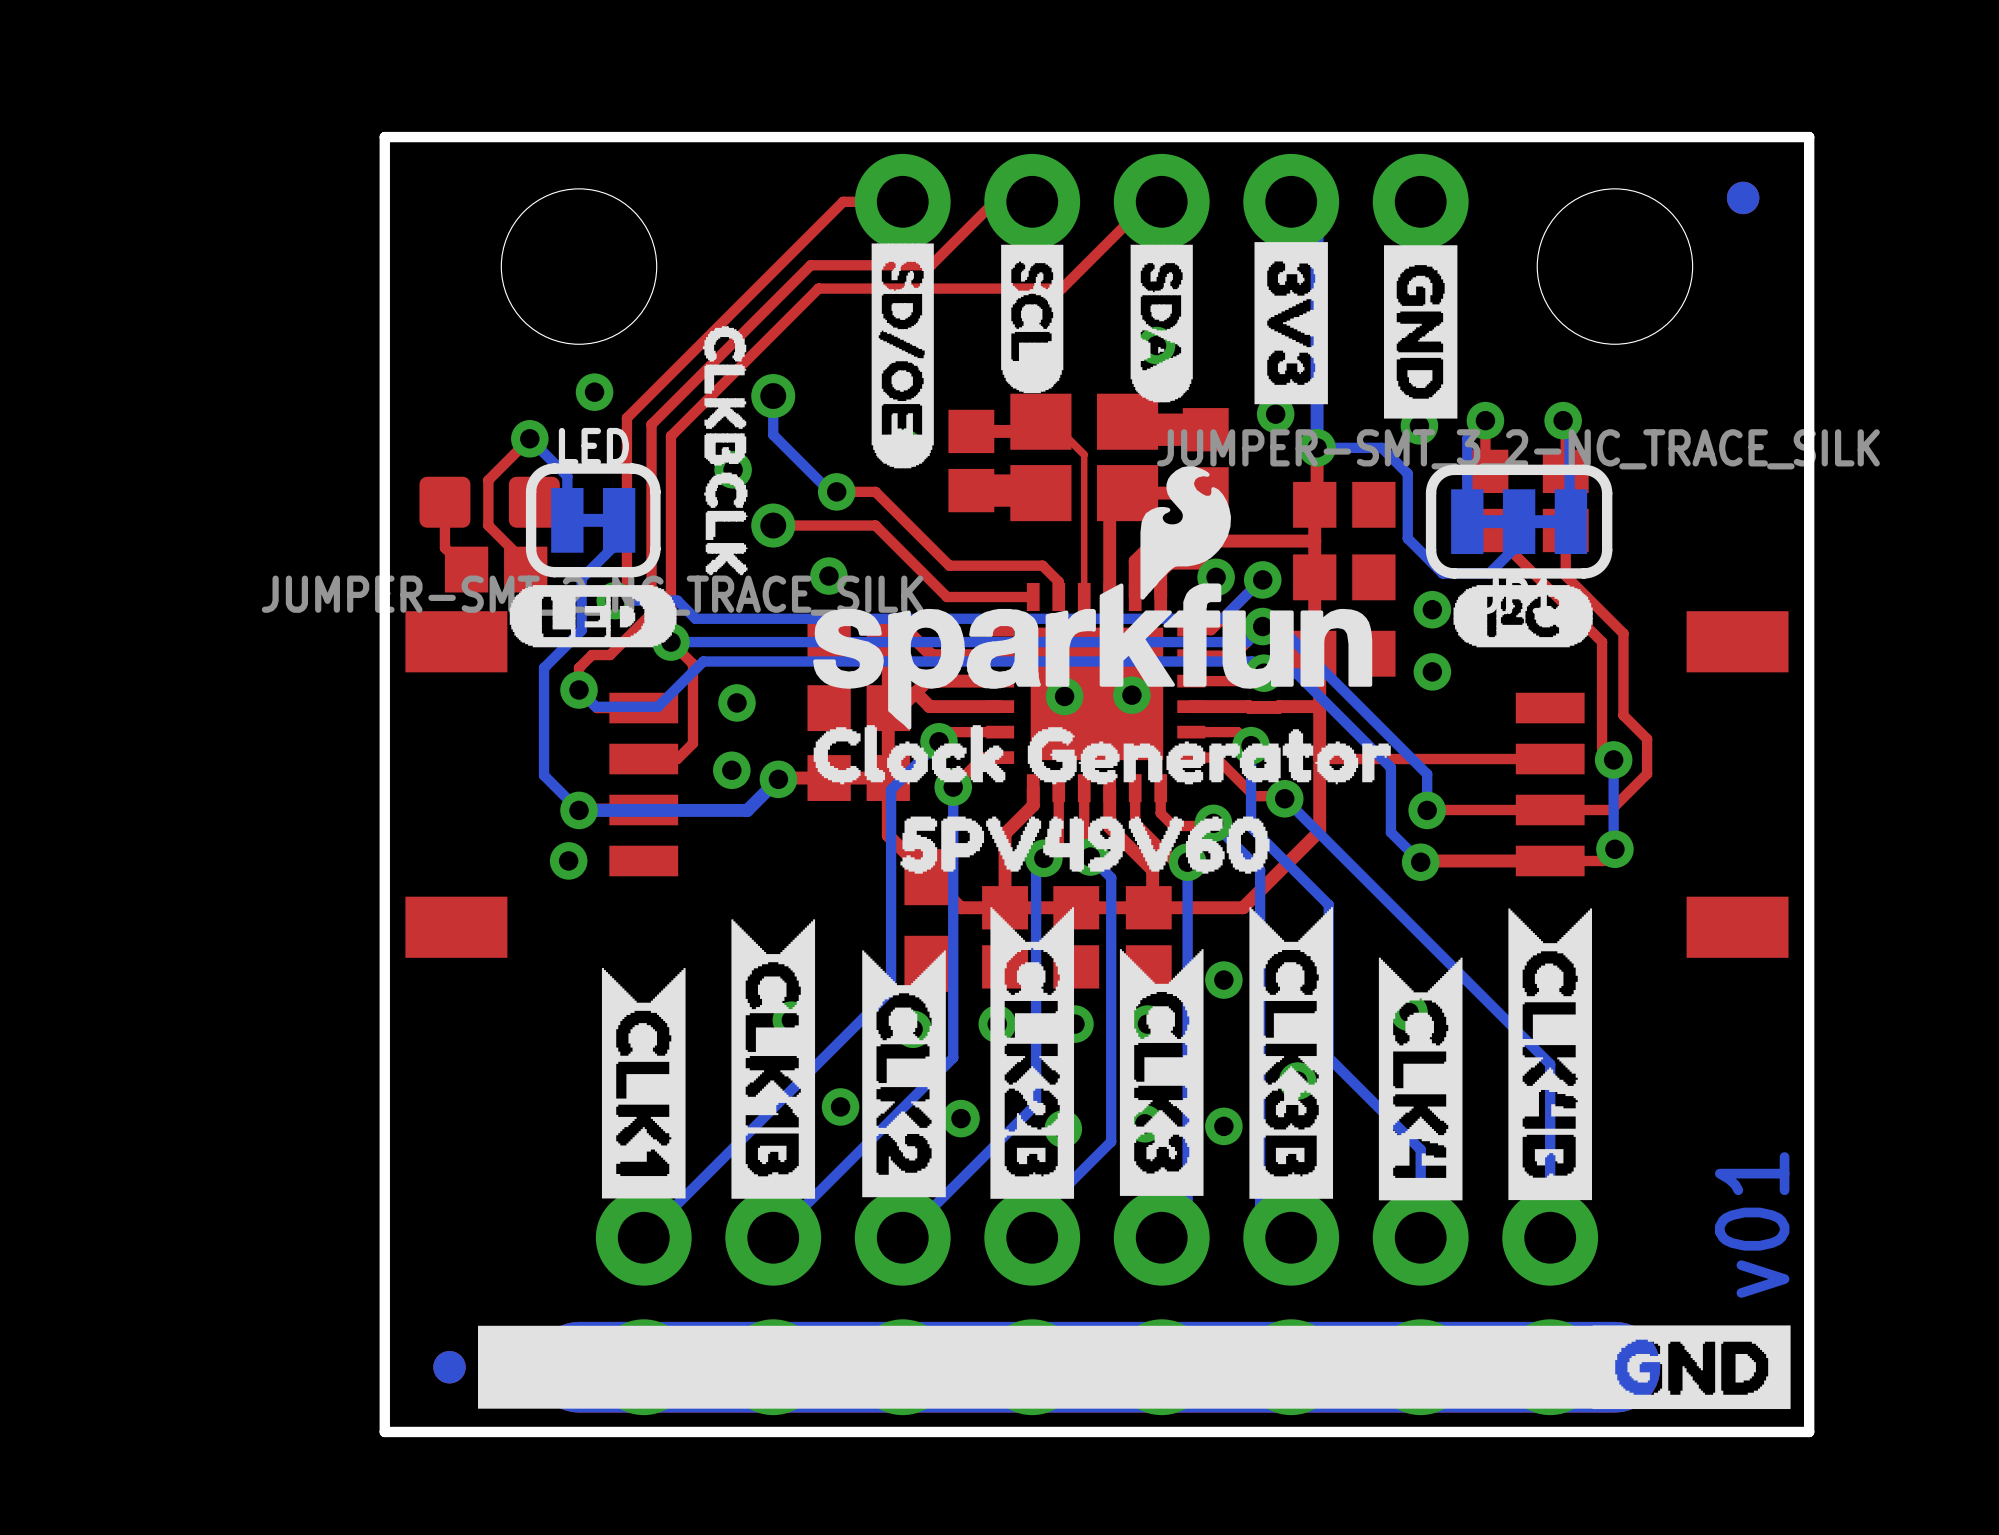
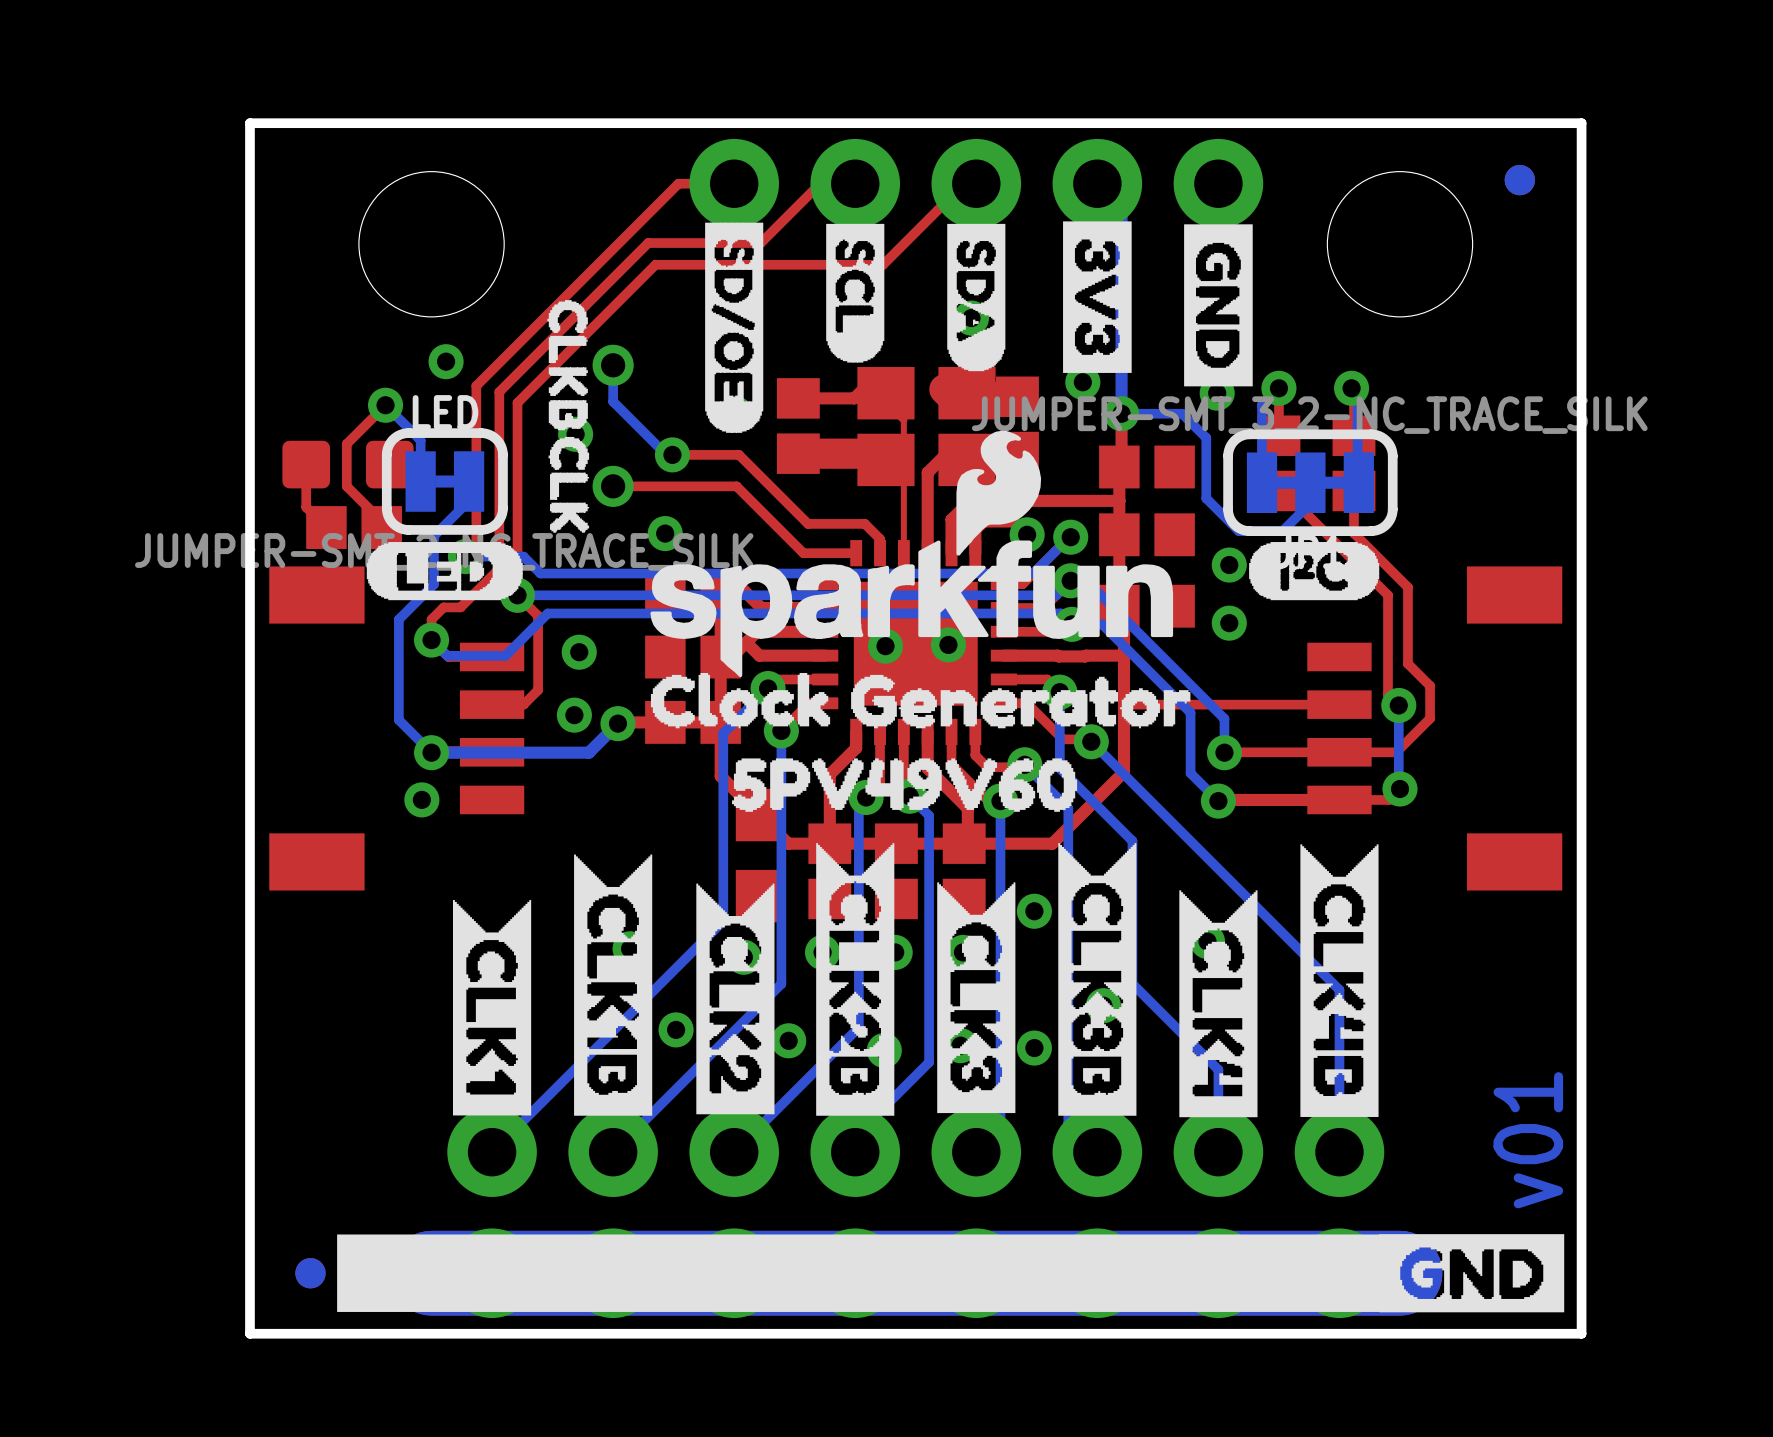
part position: (1084, 457) -> (926, 426)
top track: (875, 491) (949, 565) (981, 565) -> (708, 454) (739, 454) (808, 523)
top track: (875, 525) (947, 597) (976, 597) -> (708, 486) (736, 486) (803, 553)

